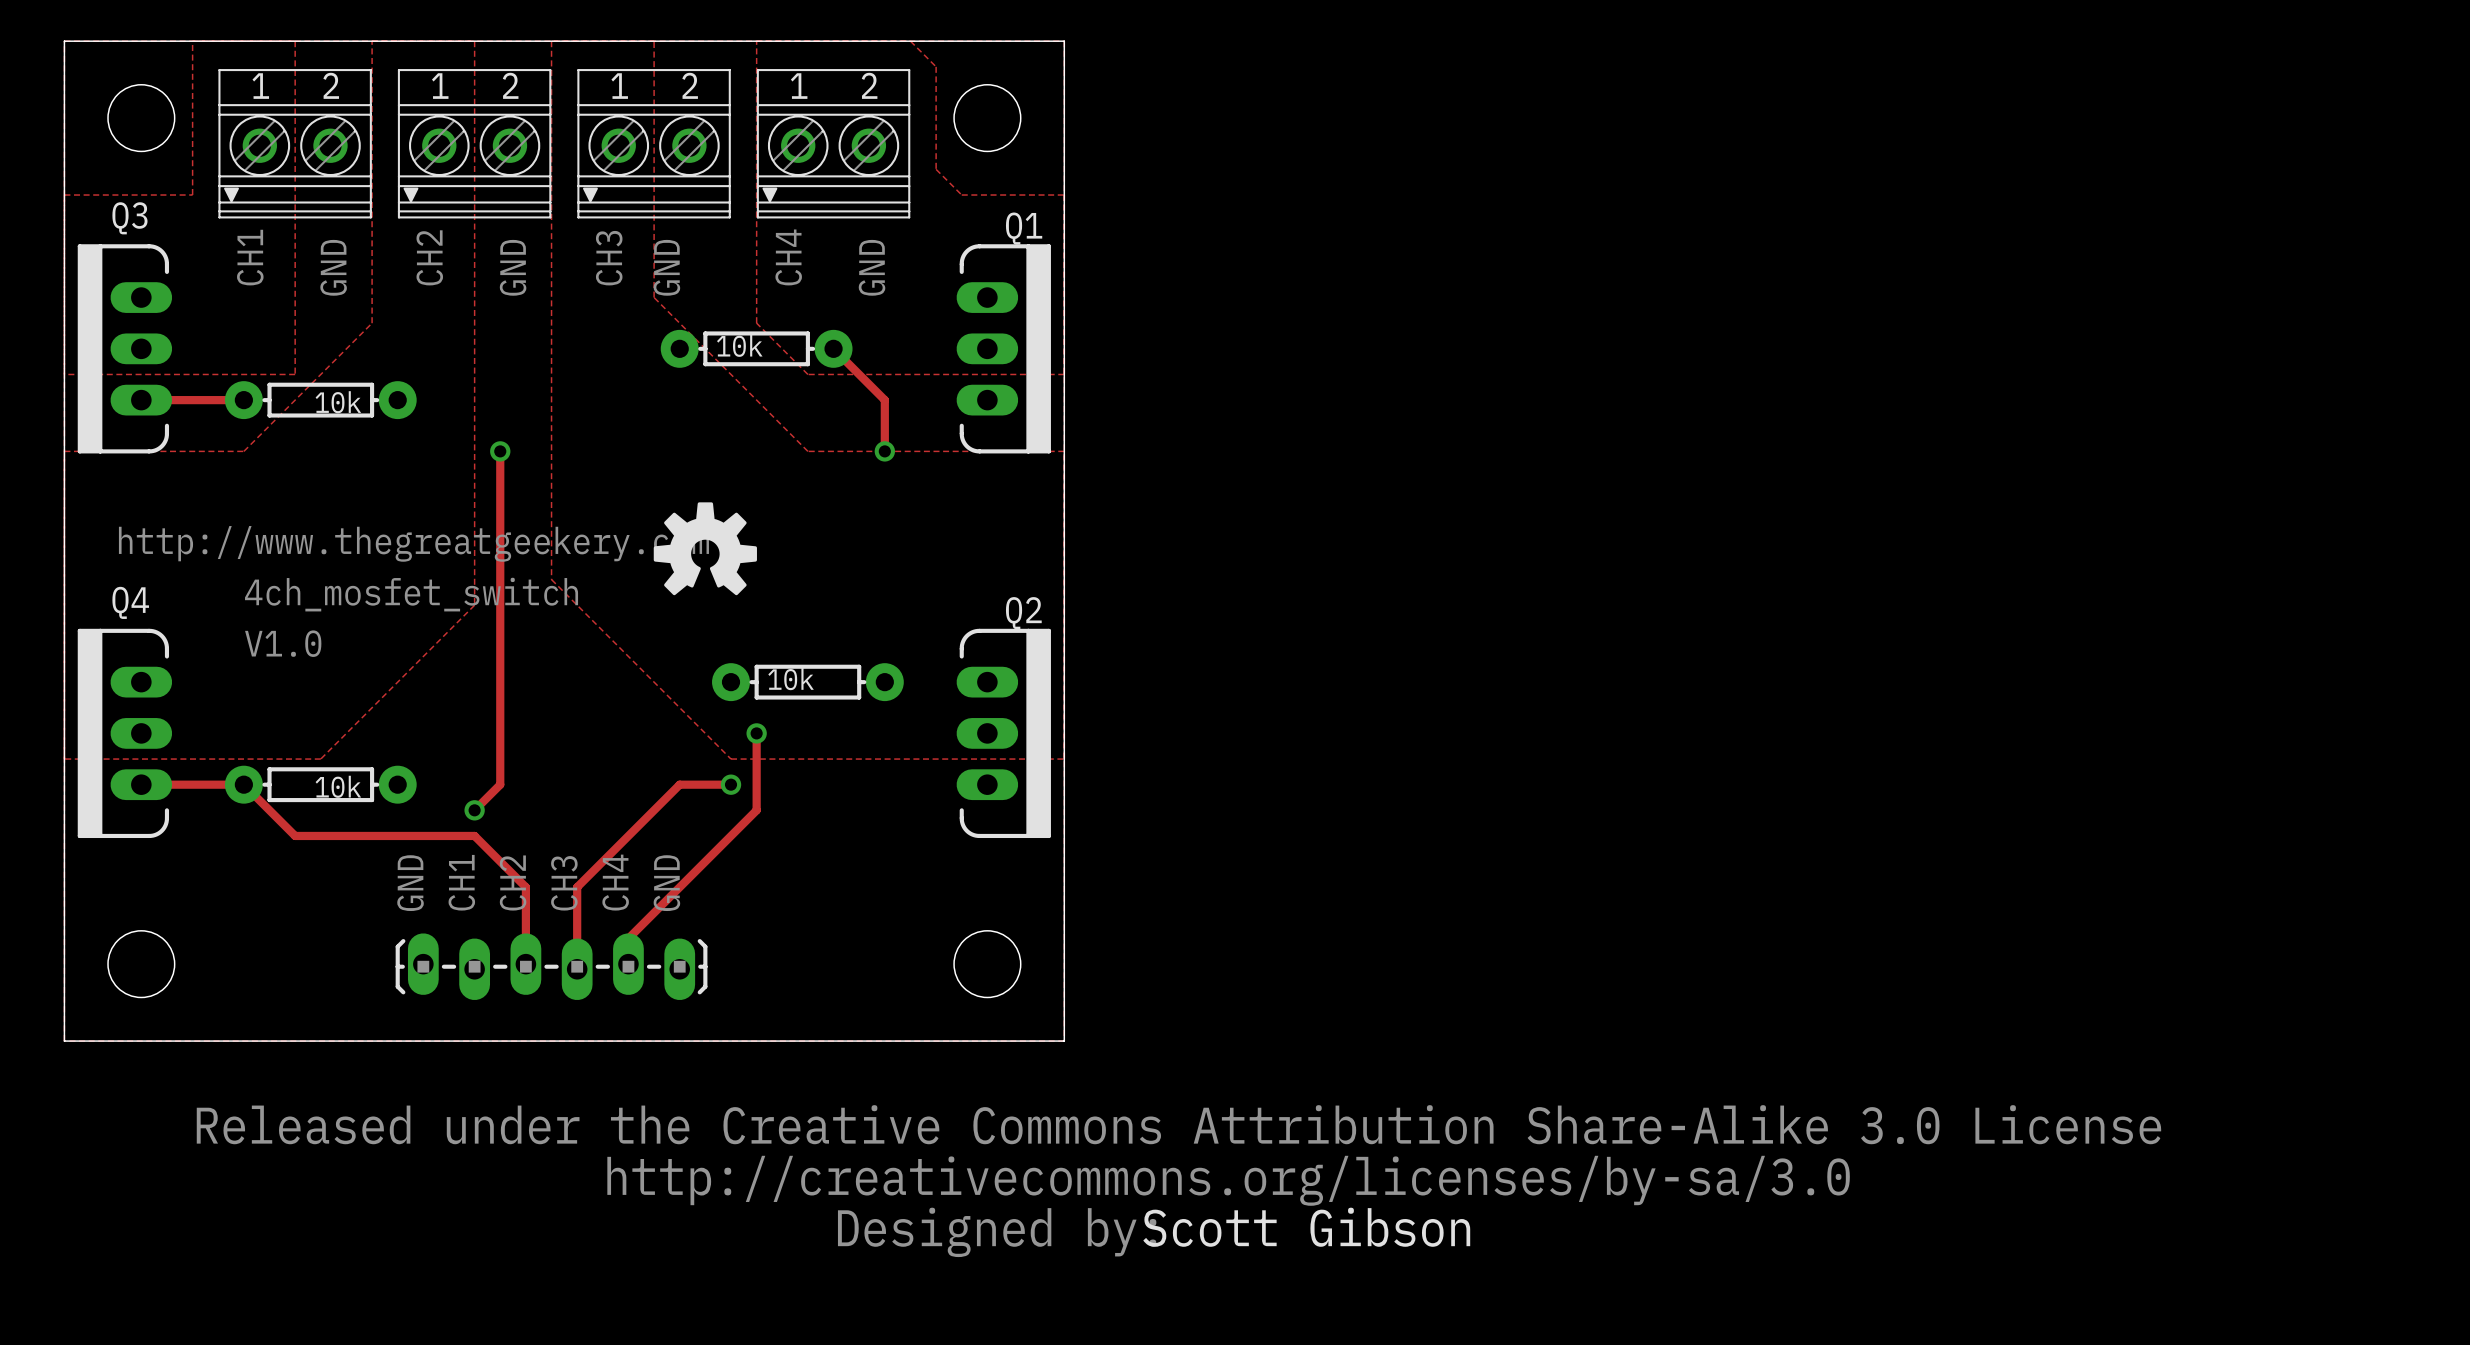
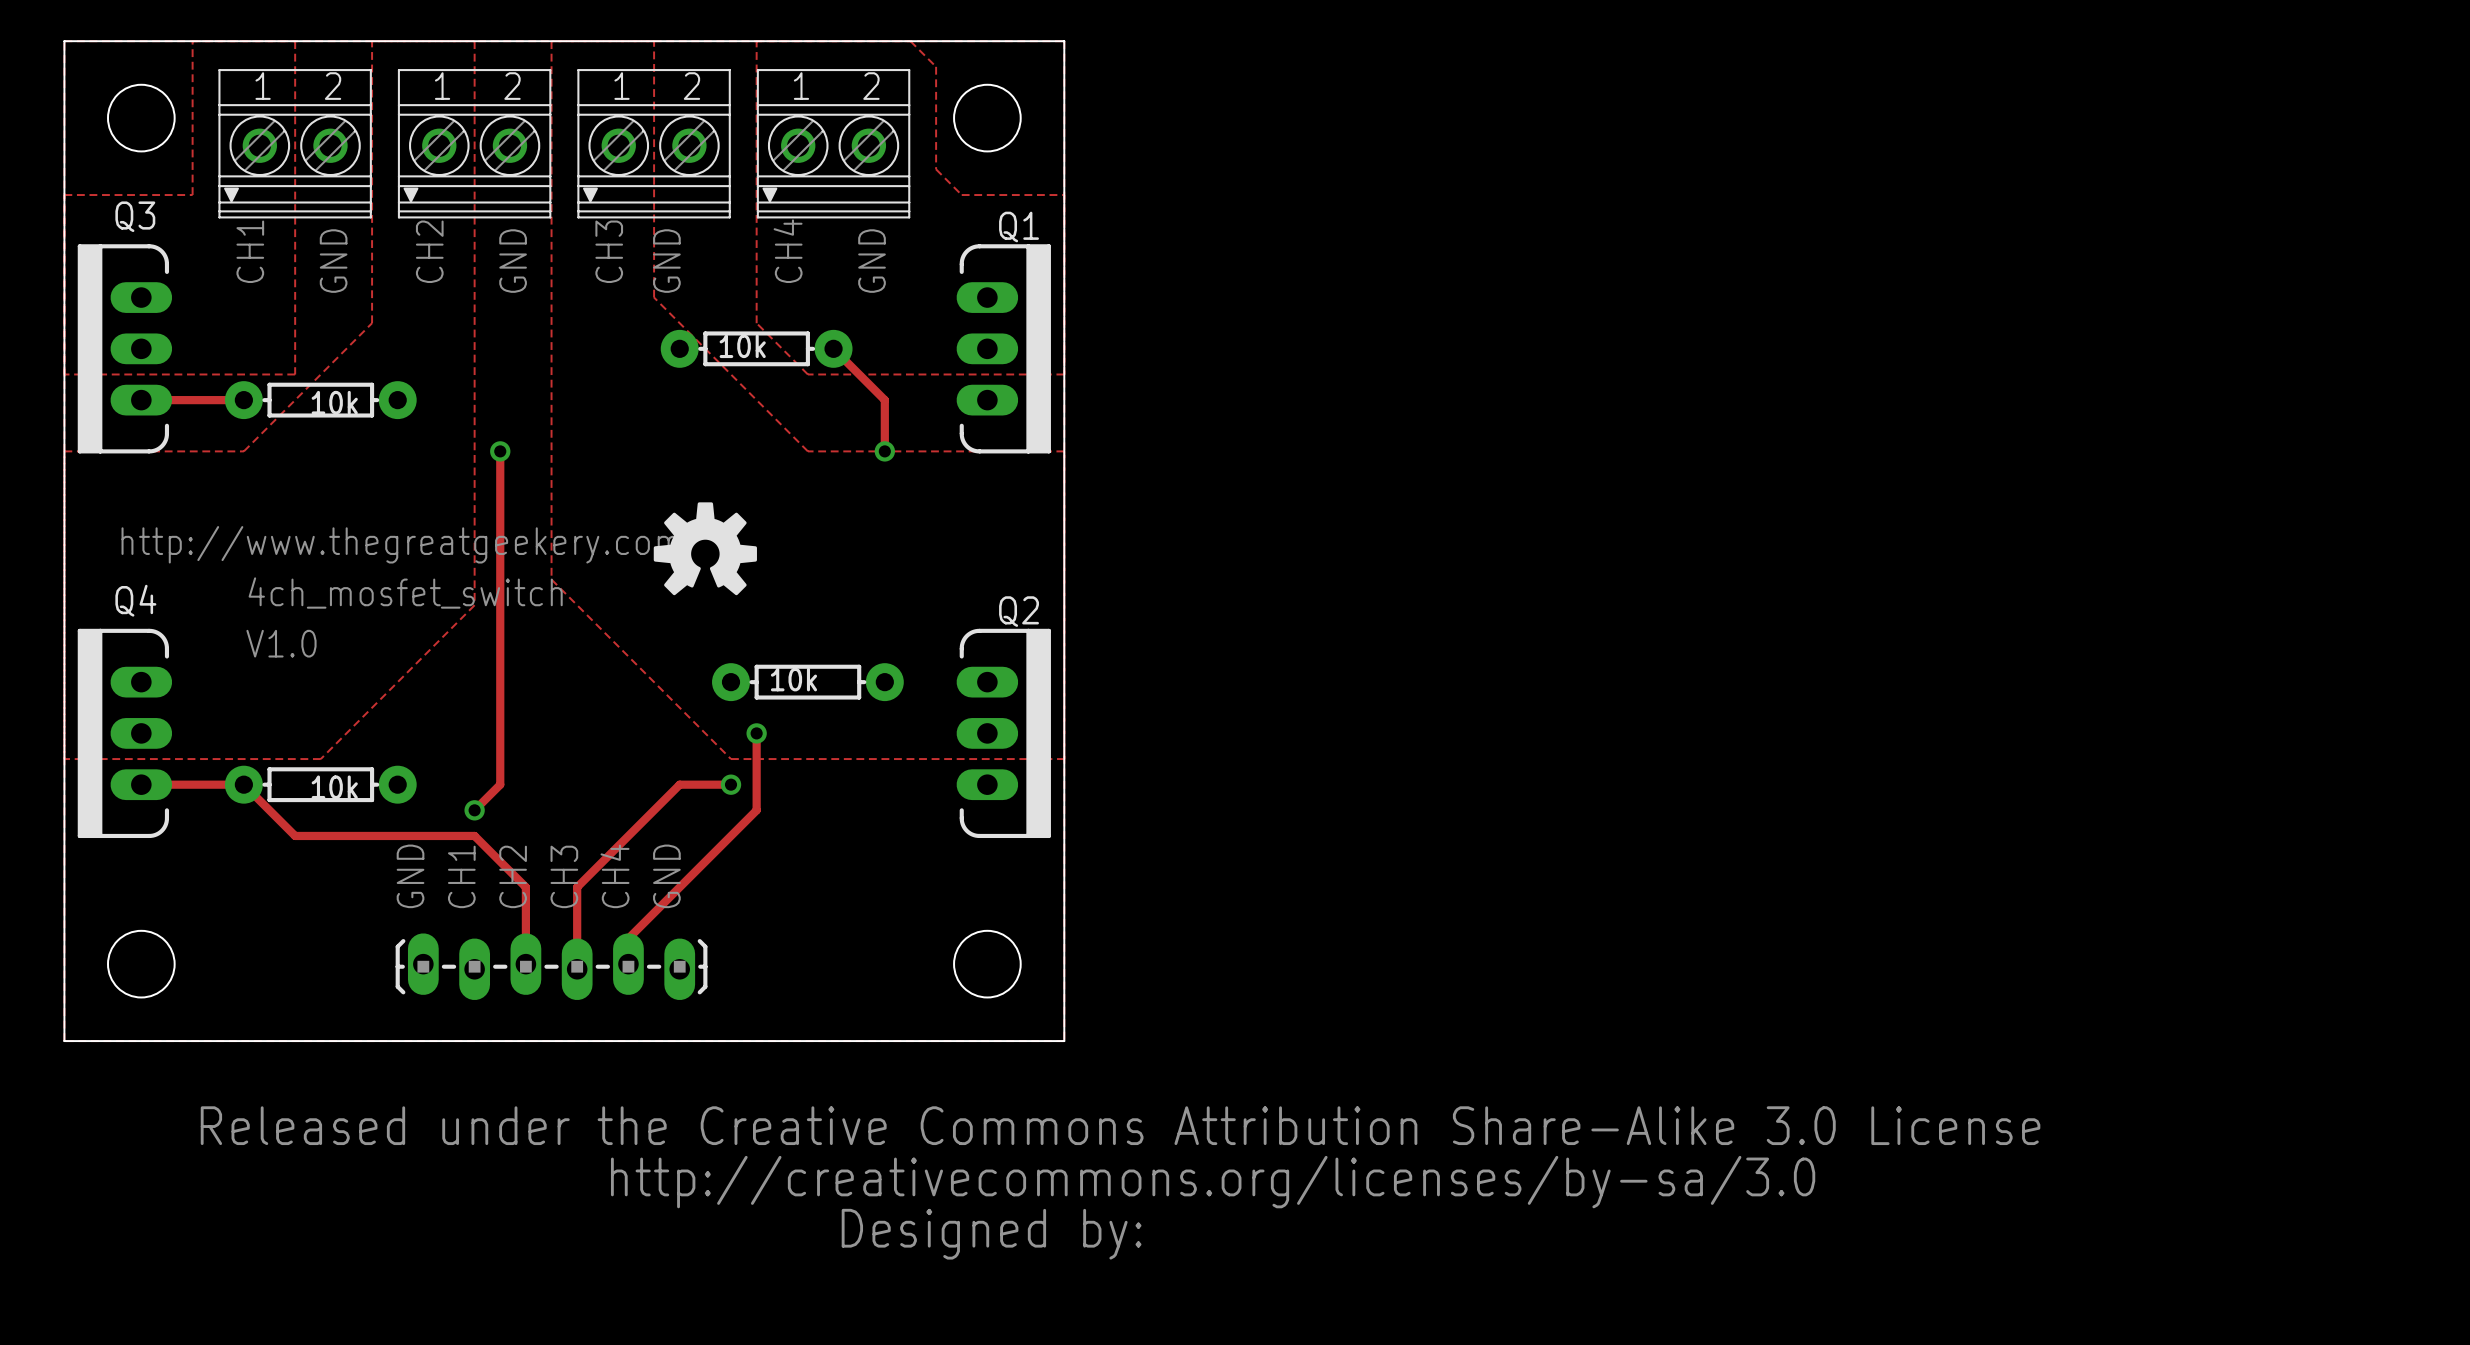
text: Scott Gibson (1306, 1227) -> none

